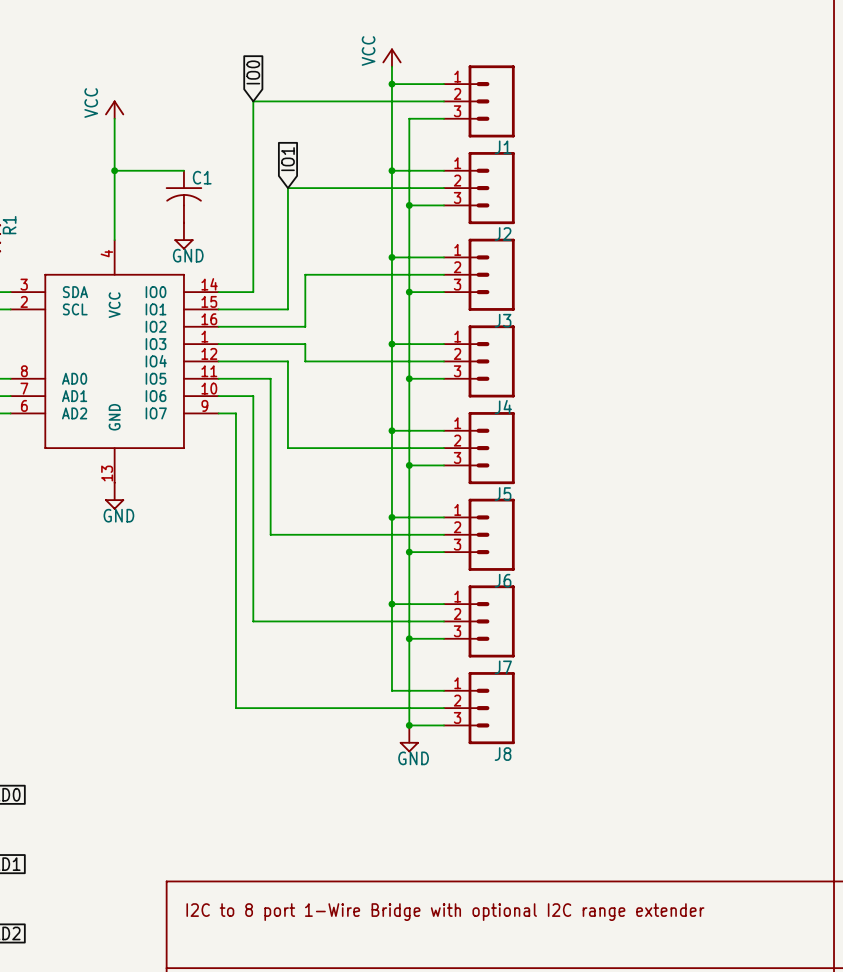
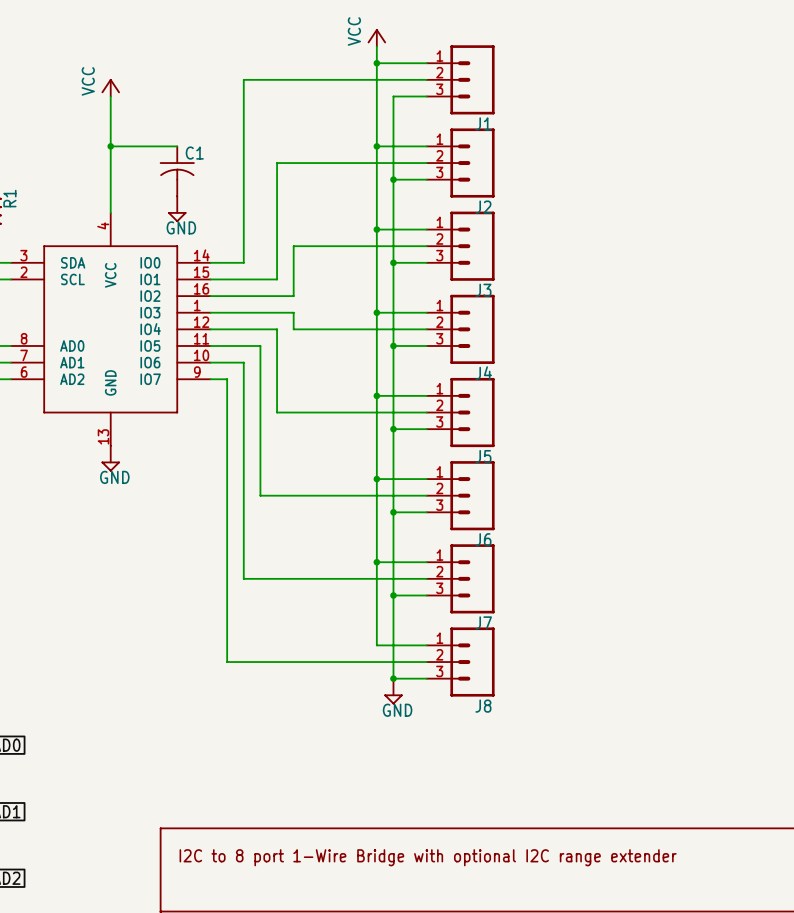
global label: IO0 (253, 72) -> none
global label: IO1 (287, 159) -> none

